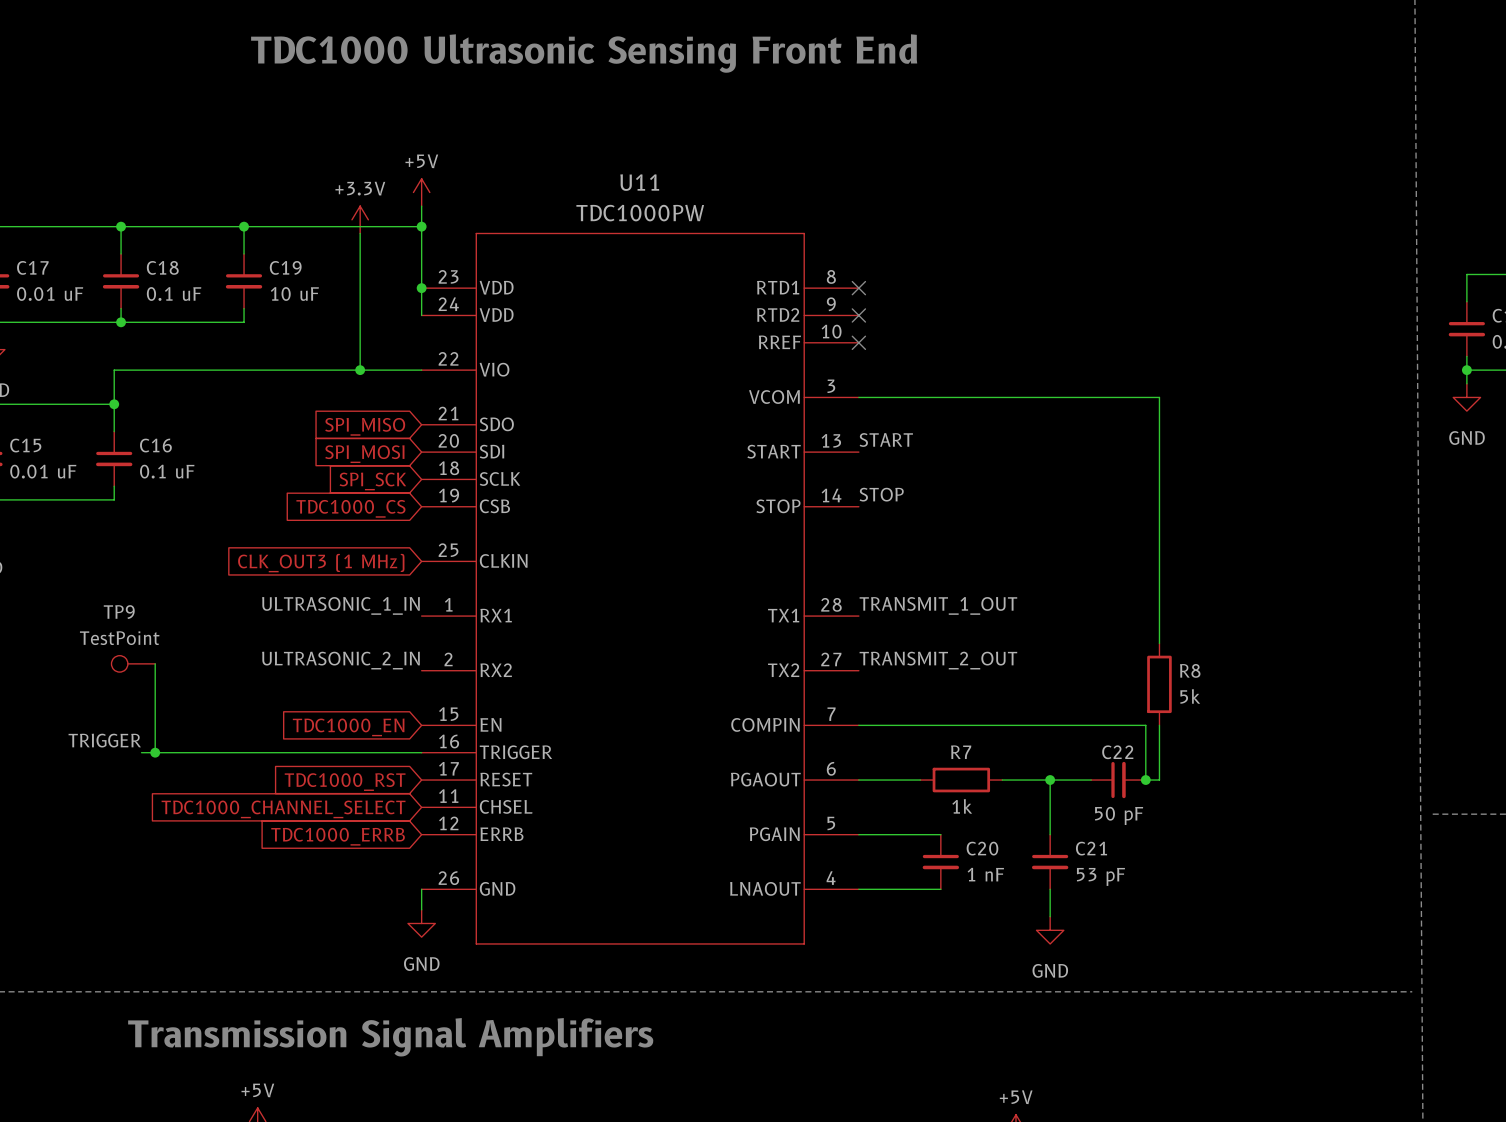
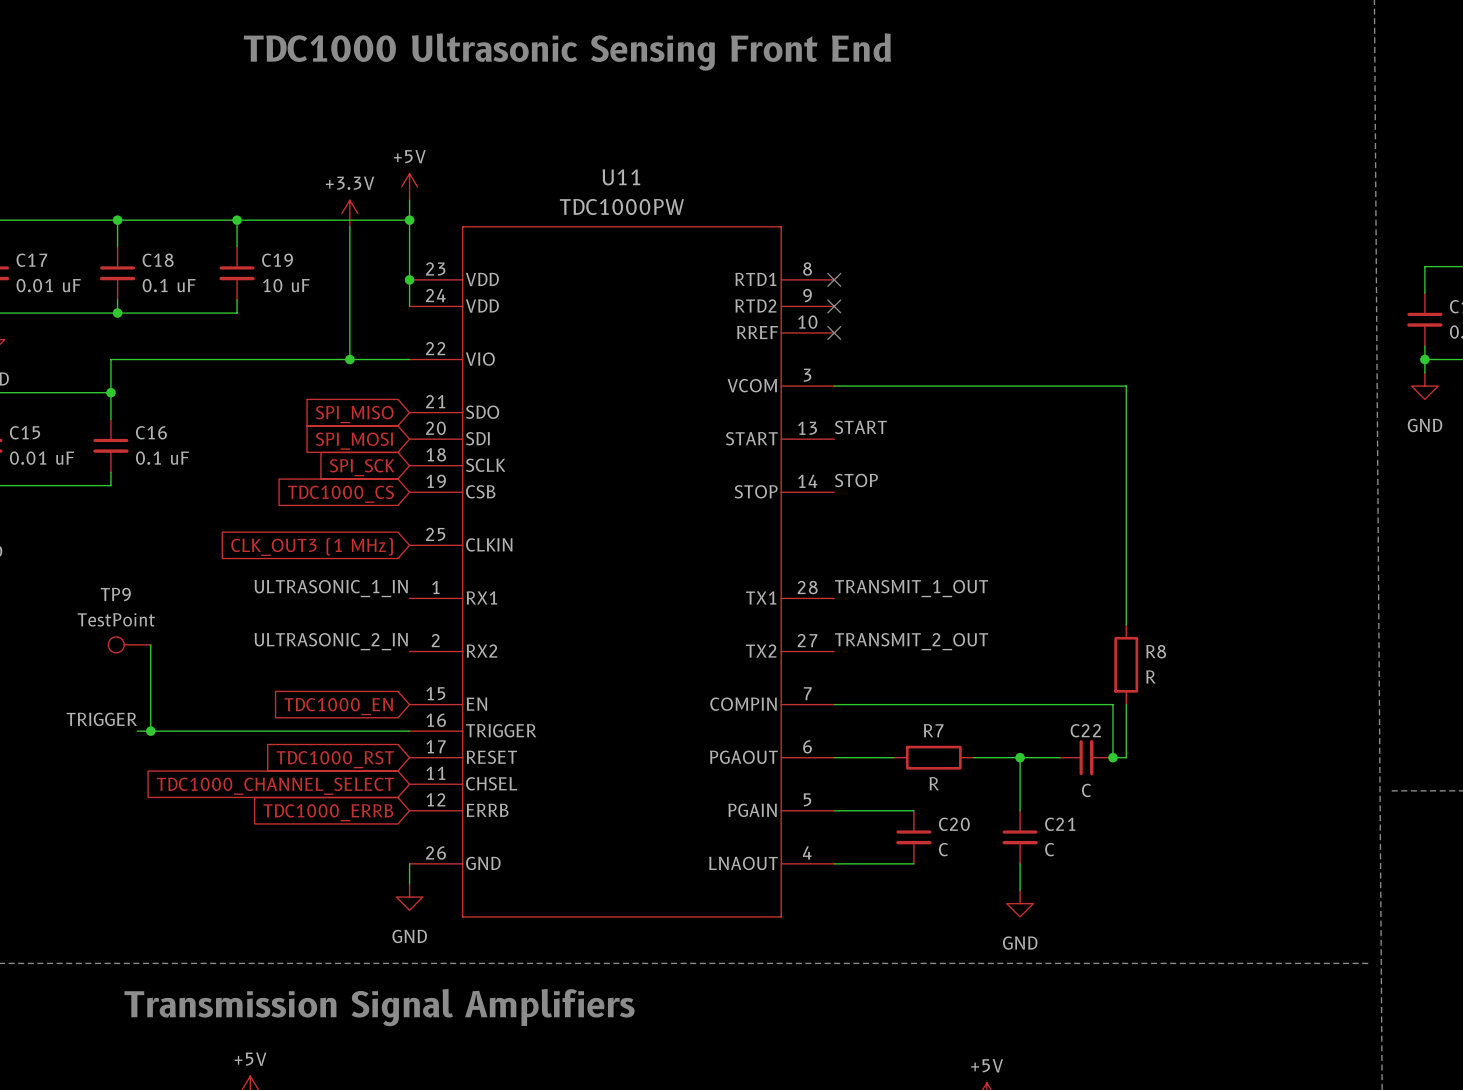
R8 value: 5k (1190, 696) -> R (1150, 676)
R7 value: 1k (962, 806) -> R (934, 783)
C22 value: 50 pF (1119, 815) -> C (1086, 790)
C20 value: 1 nF (985, 874) -> C (943, 849)
C21 value: 53 pF (1100, 876) -> C (1049, 849)

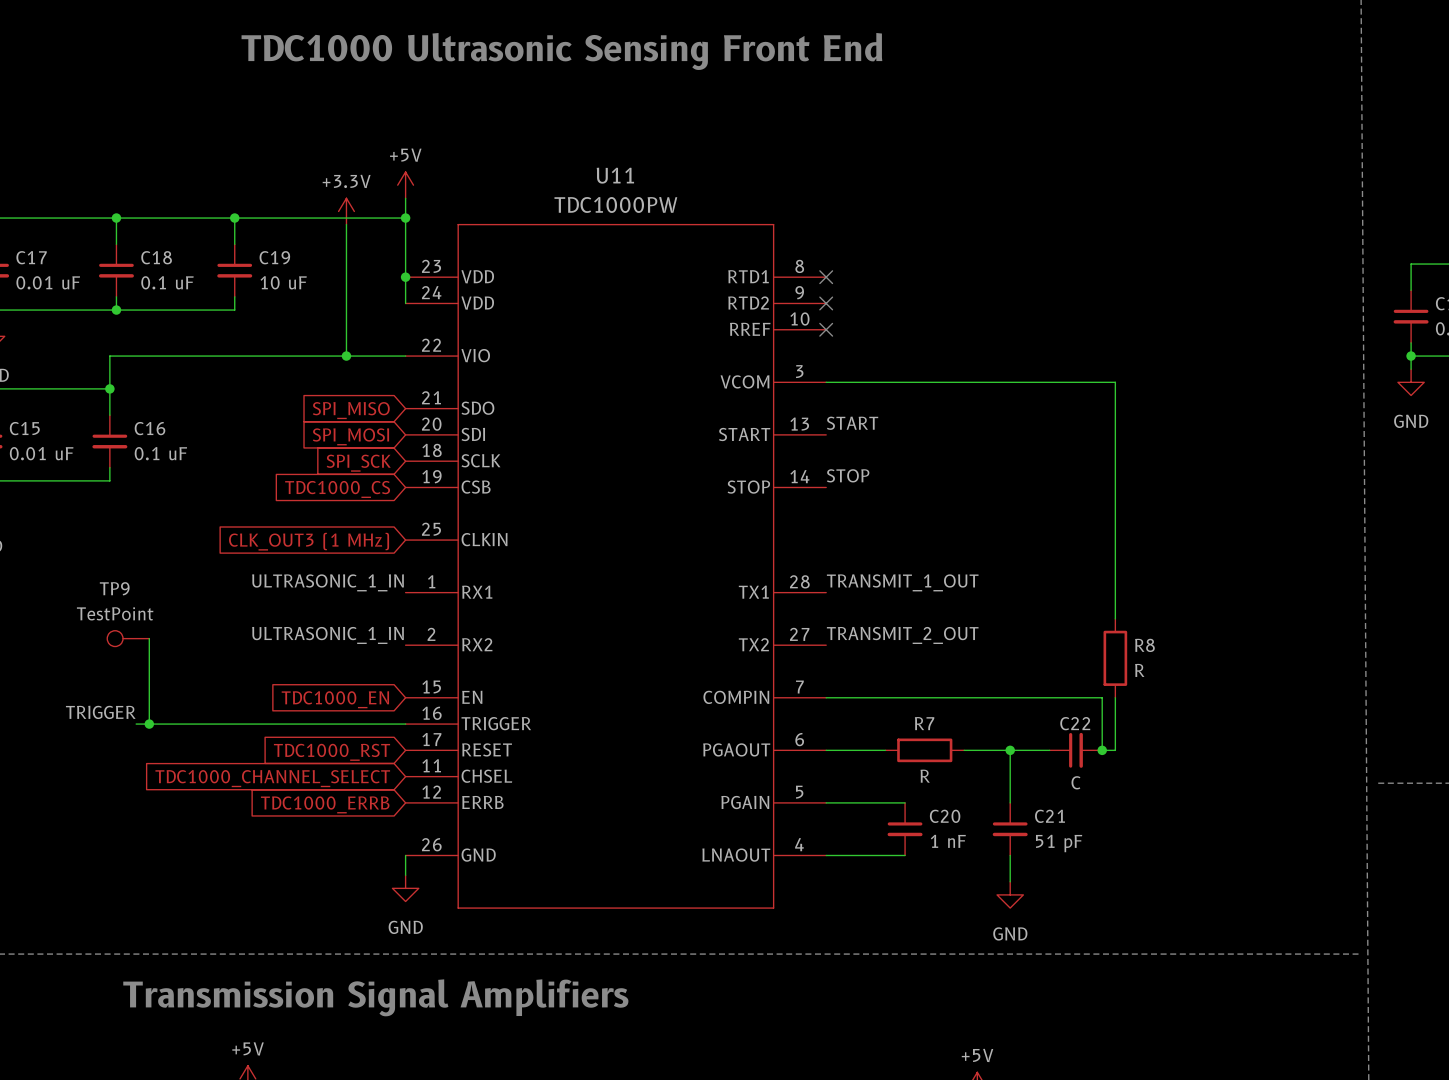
label: ULTRASONIC_2_IN (331, 641) -> ULTRASONIC_1_IN (327, 635)
C20 value: C (943, 849) -> 1 nF (948, 841)
C21 value: C (1049, 849) -> 51 pF (1059, 843)

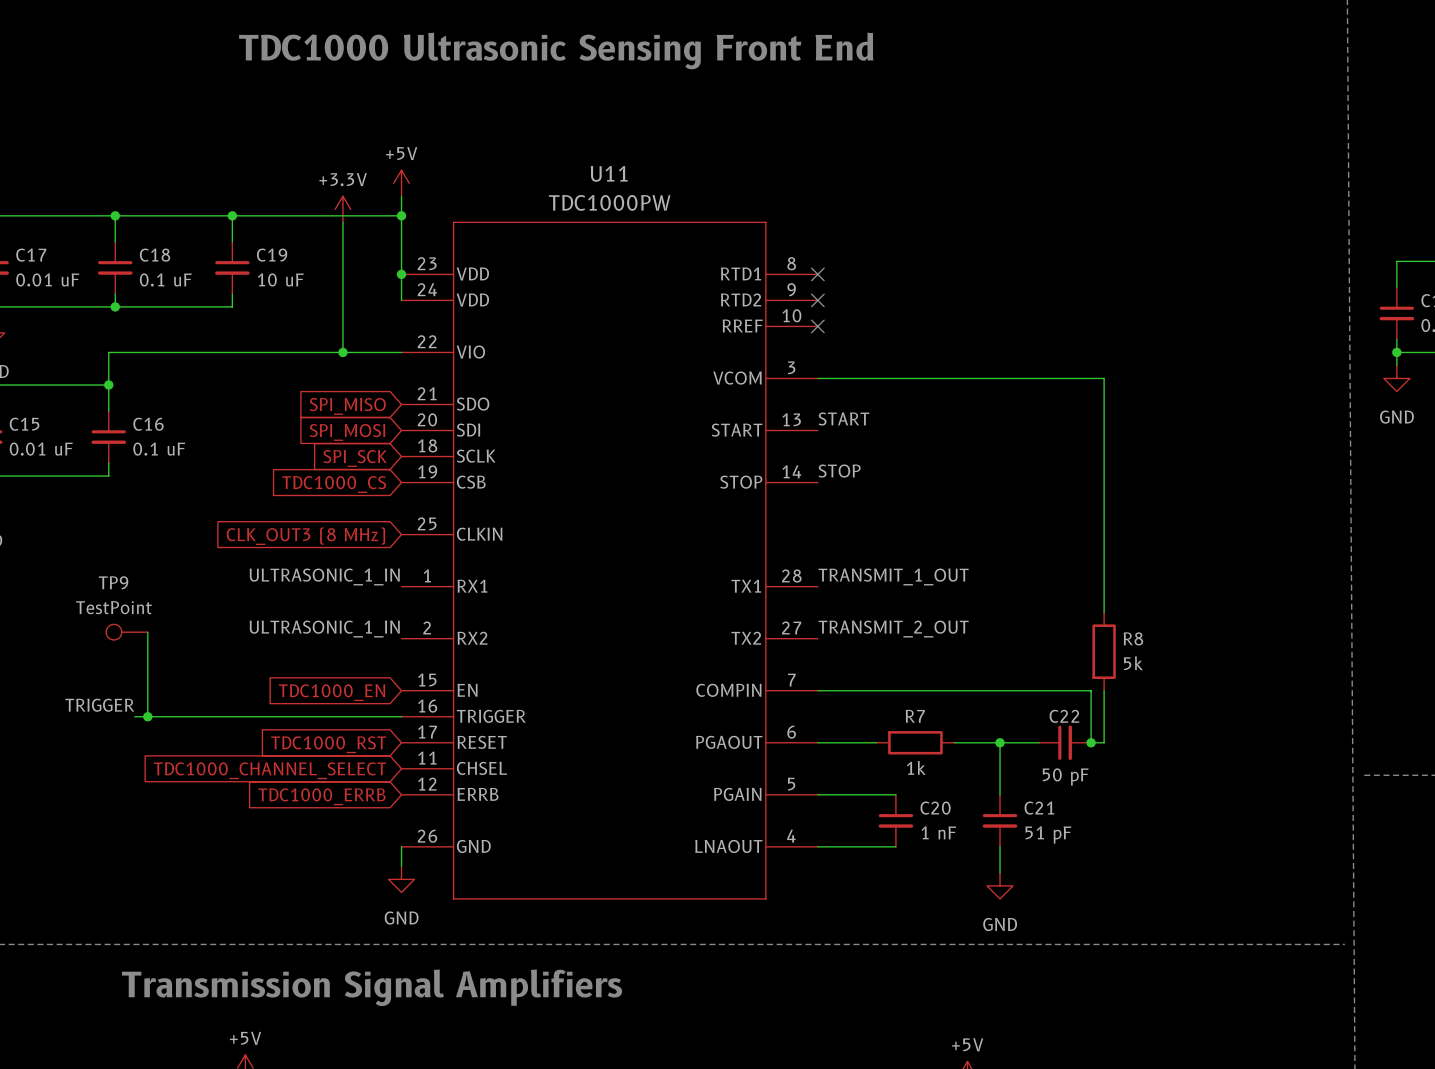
global label: CLK_OUT3 (1 MHz) (309, 541) -> CLK_OUT3 (8 MHz) (305, 536)
R8 value: R (1139, 670) -> 5k (1133, 663)
R7 value: R (925, 776) -> 1k (916, 767)
C22 value: C (1075, 782) -> 50 pF (1065, 776)

